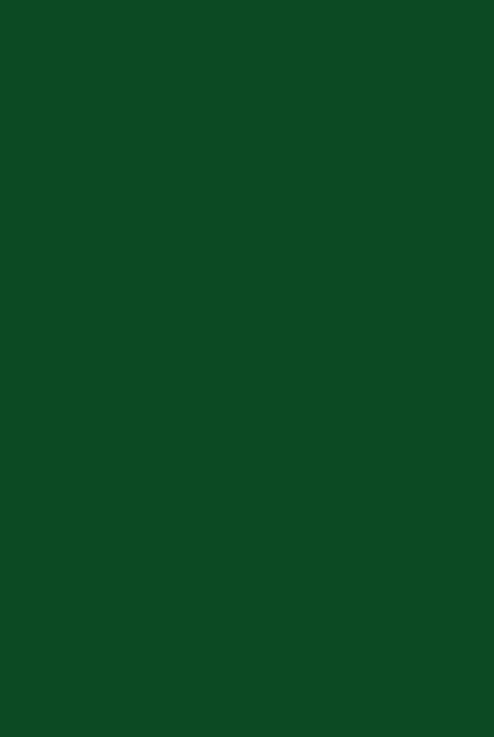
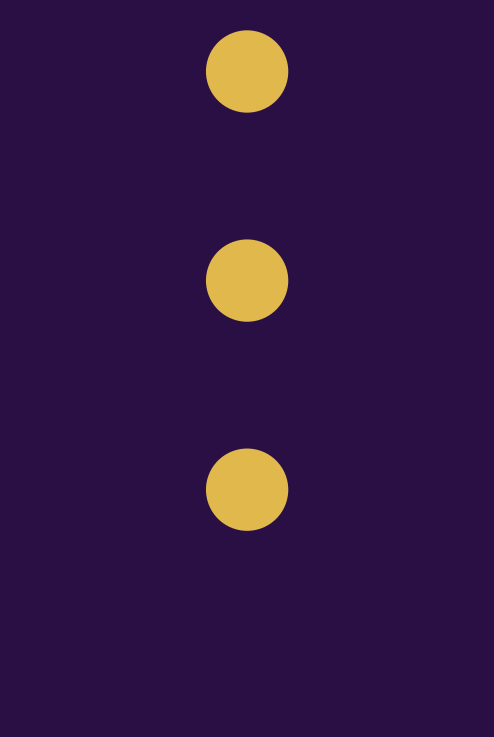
part: none -> (247, 71)
part: none -> (247, 280)
part: none -> (247, 489)

